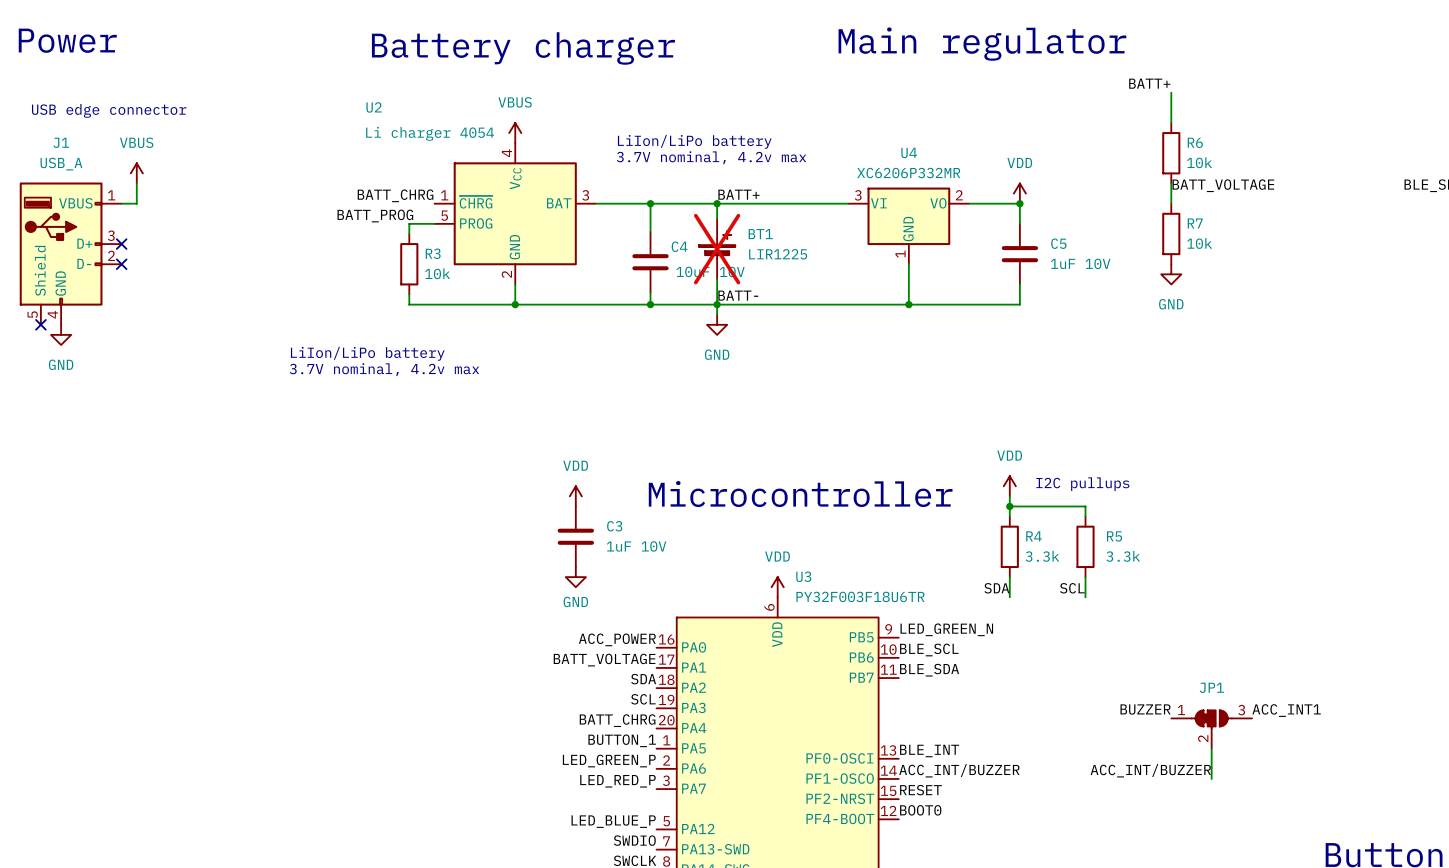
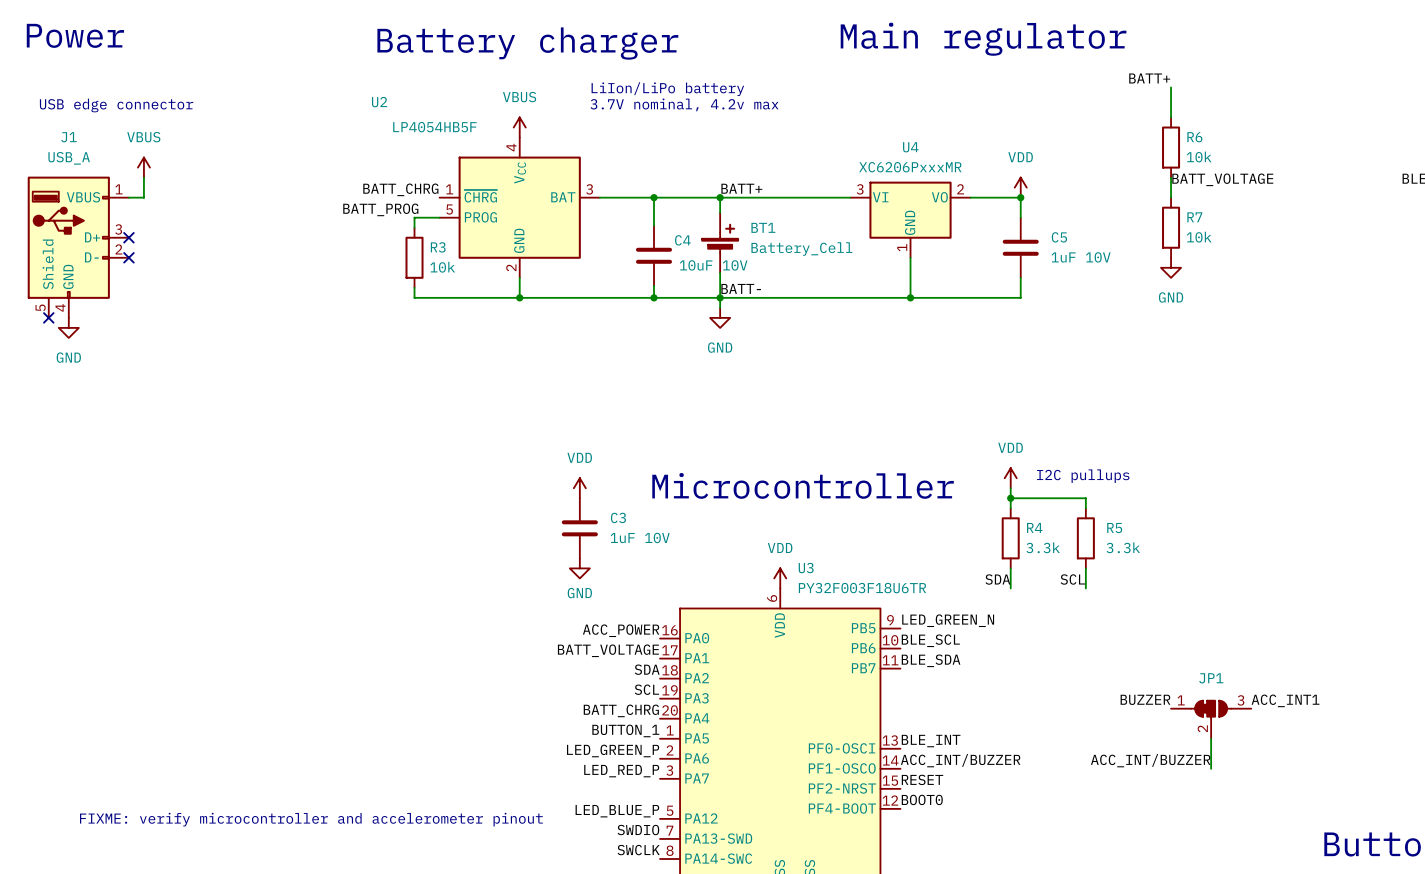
U2 value: Li charger 4054 (430, 133) -> LP4054HB5F (434, 127)
text position: LiIon/LiPo battery (694, 141) -> LiIon/LiPo battery (667, 89)
text position: 3.7V nominal, 4.2v max (711, 157) -> 3.7V nominal, 4.2v max (684, 104)
U4 value: XC6206P332MR (908, 173) -> XC6206PxxxMR (910, 167)
BT1 do-not-place cross: (717, 249) -> none
BT1 value: LIR1225 (778, 254) -> Battery_Cell (801, 249)
text: LiIon/LiPo battery (367, 353) -> none
text: 3.7V nominal, 4.2v max (384, 369) -> none
text: none -> FIXME: verify microcontroller and accelerometer pinout (311, 819)

